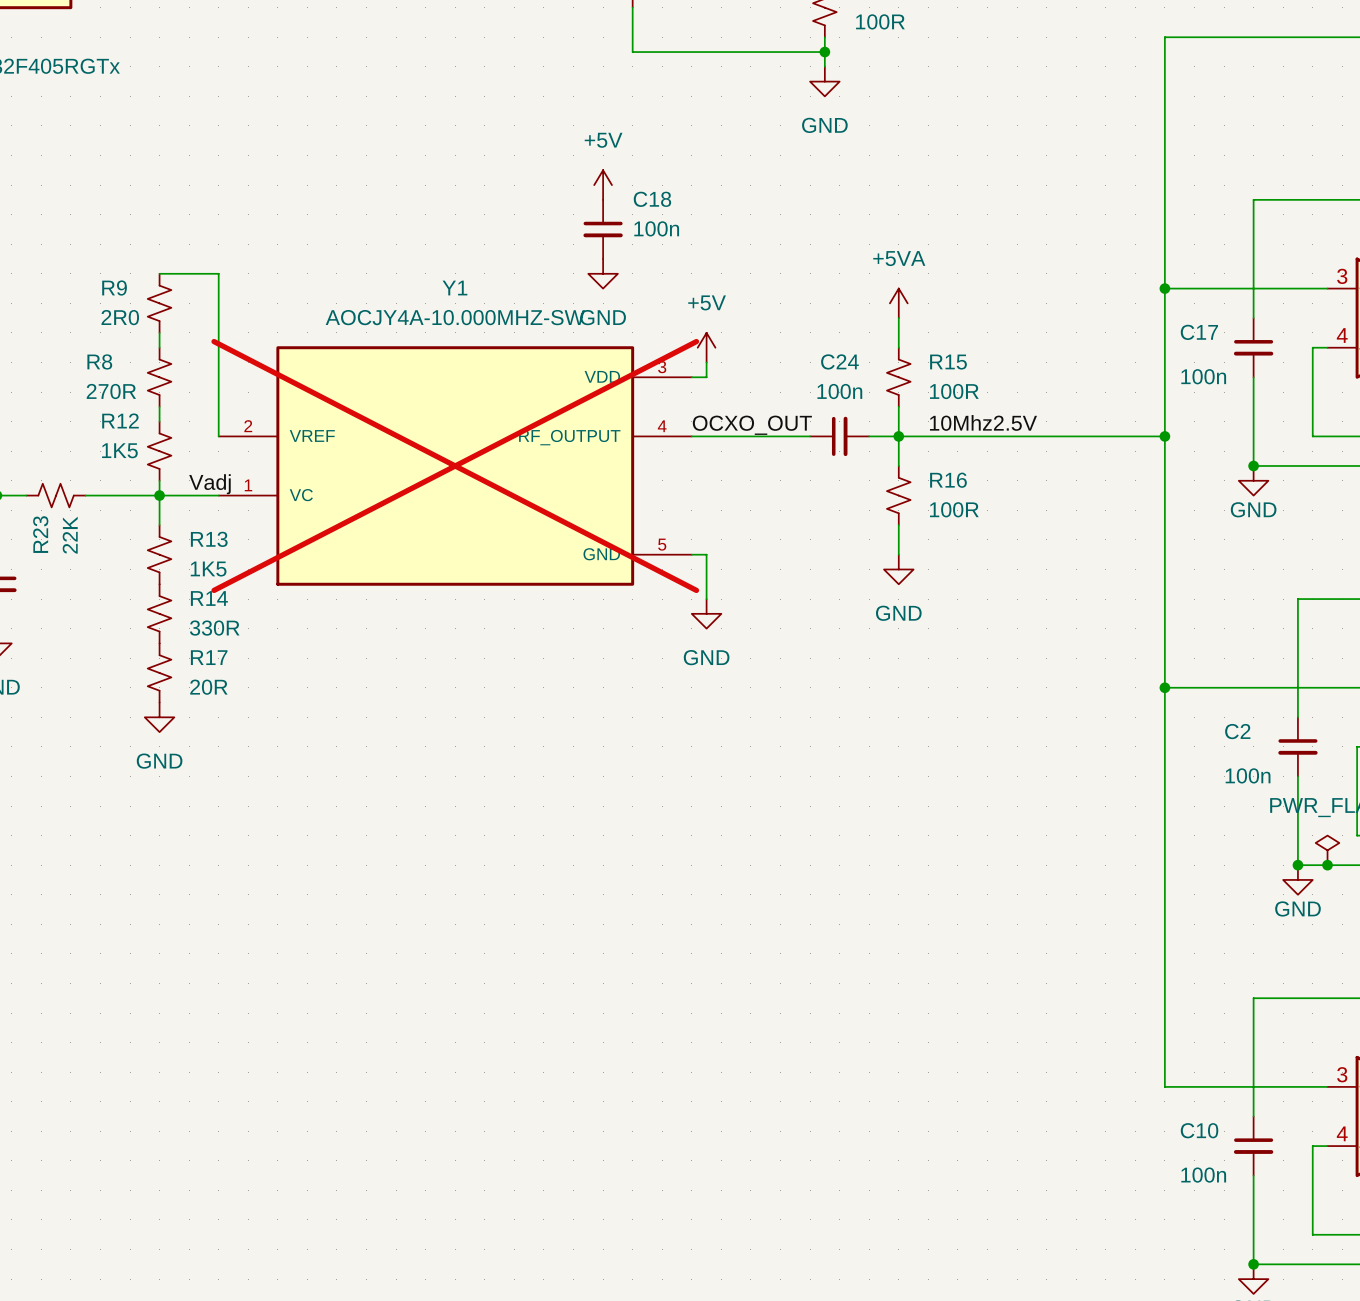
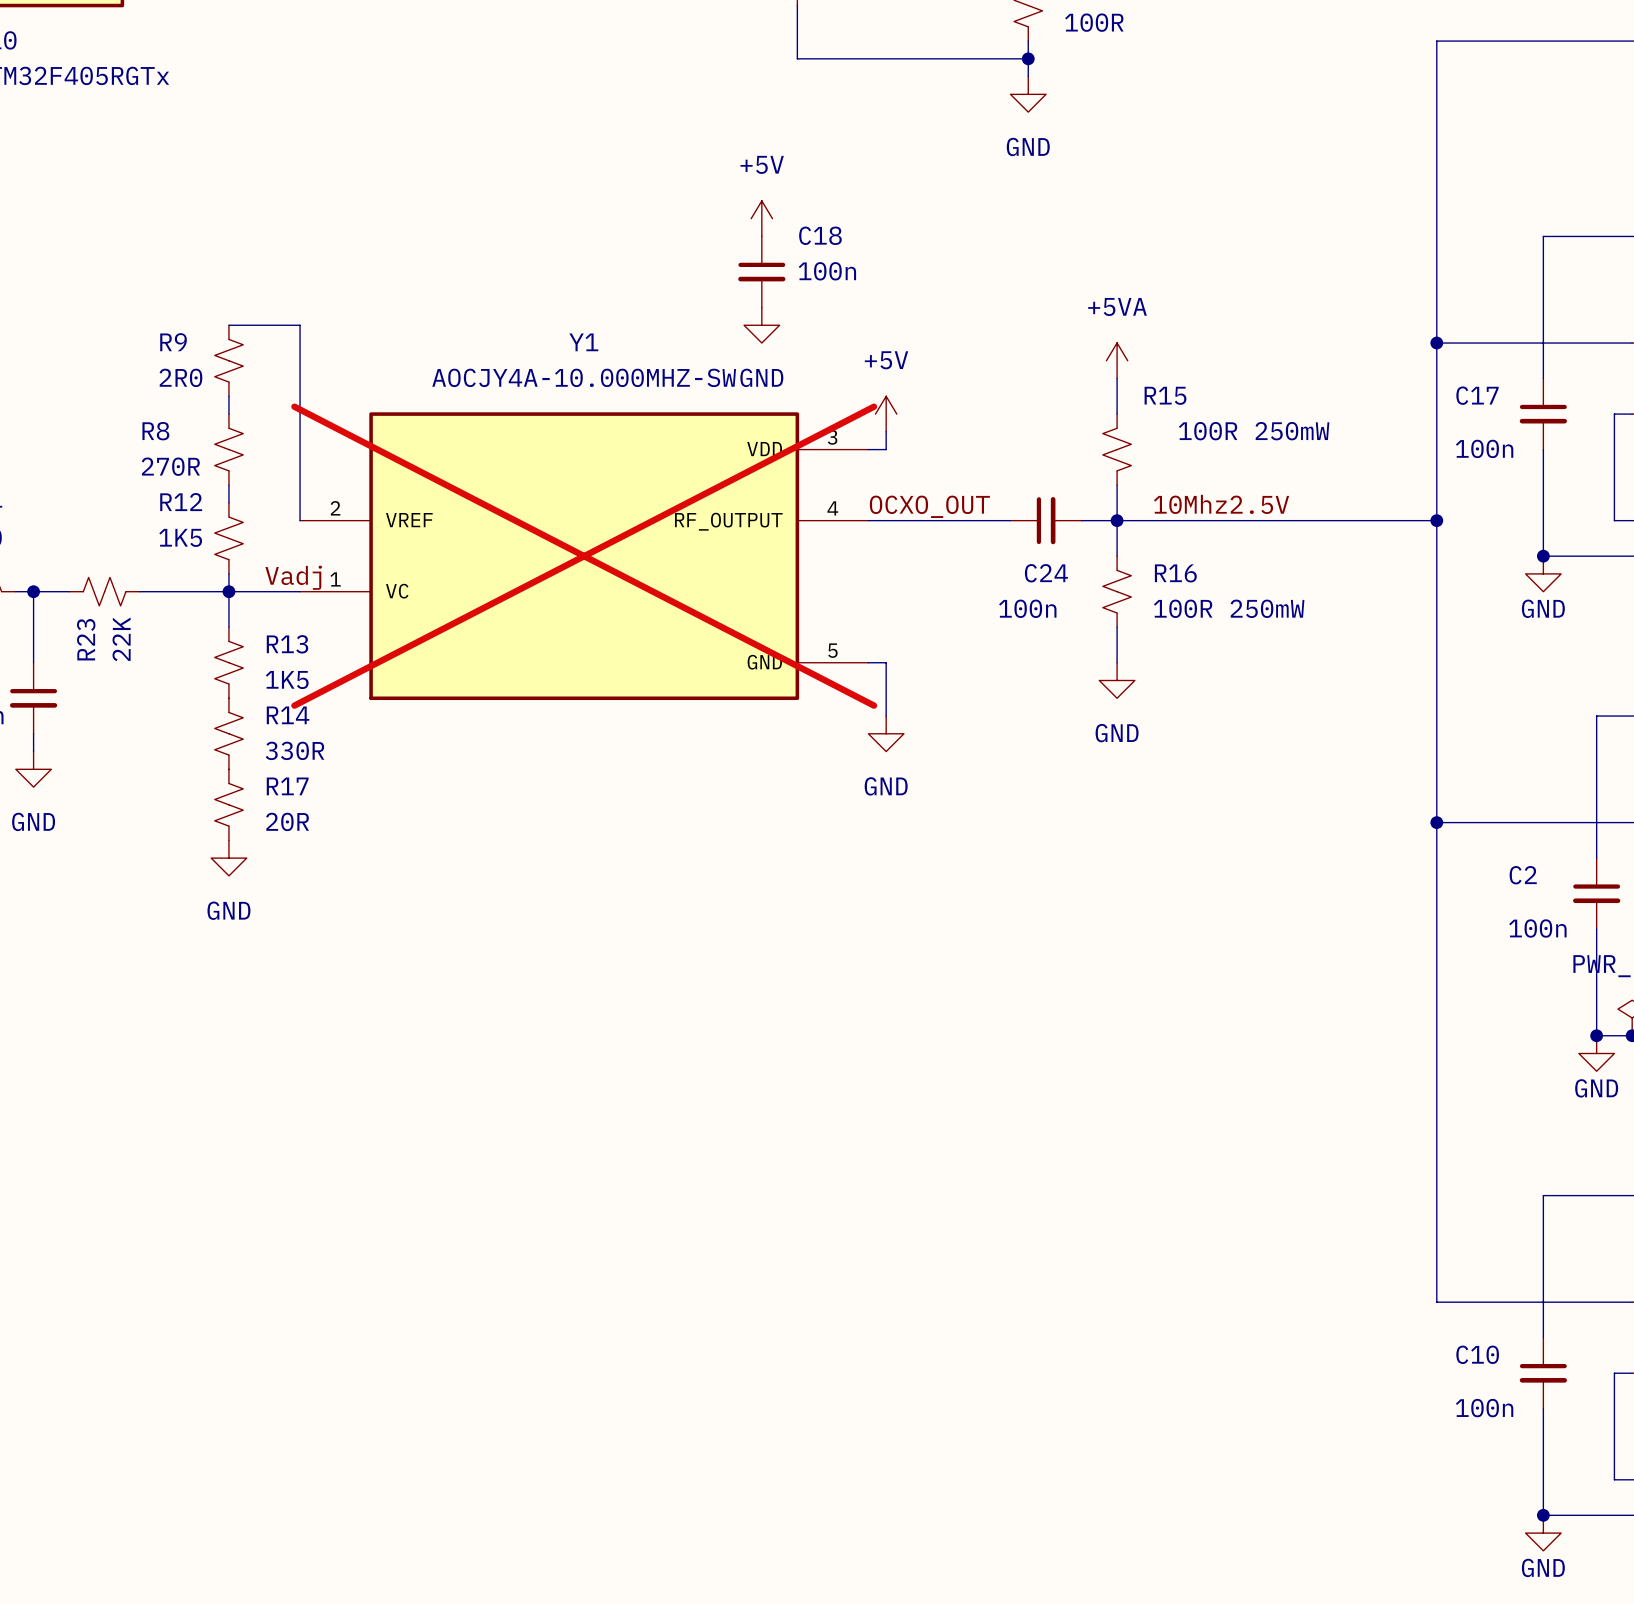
C24 name position: C24 (839, 361) -> C24 (1046, 573)
R15 name position: R15 (948, 362) -> R15 (1165, 395)
R15 flip: as is (898, 377) -> left-right (1117, 449)
C24 value position: 100n (839, 391) -> 100n (1027, 608)
R15 value: 100R (954, 391) -> 100R 250mW (1254, 431)
R16 value: 100R (954, 509) -> 100R 250mW (1229, 608)

